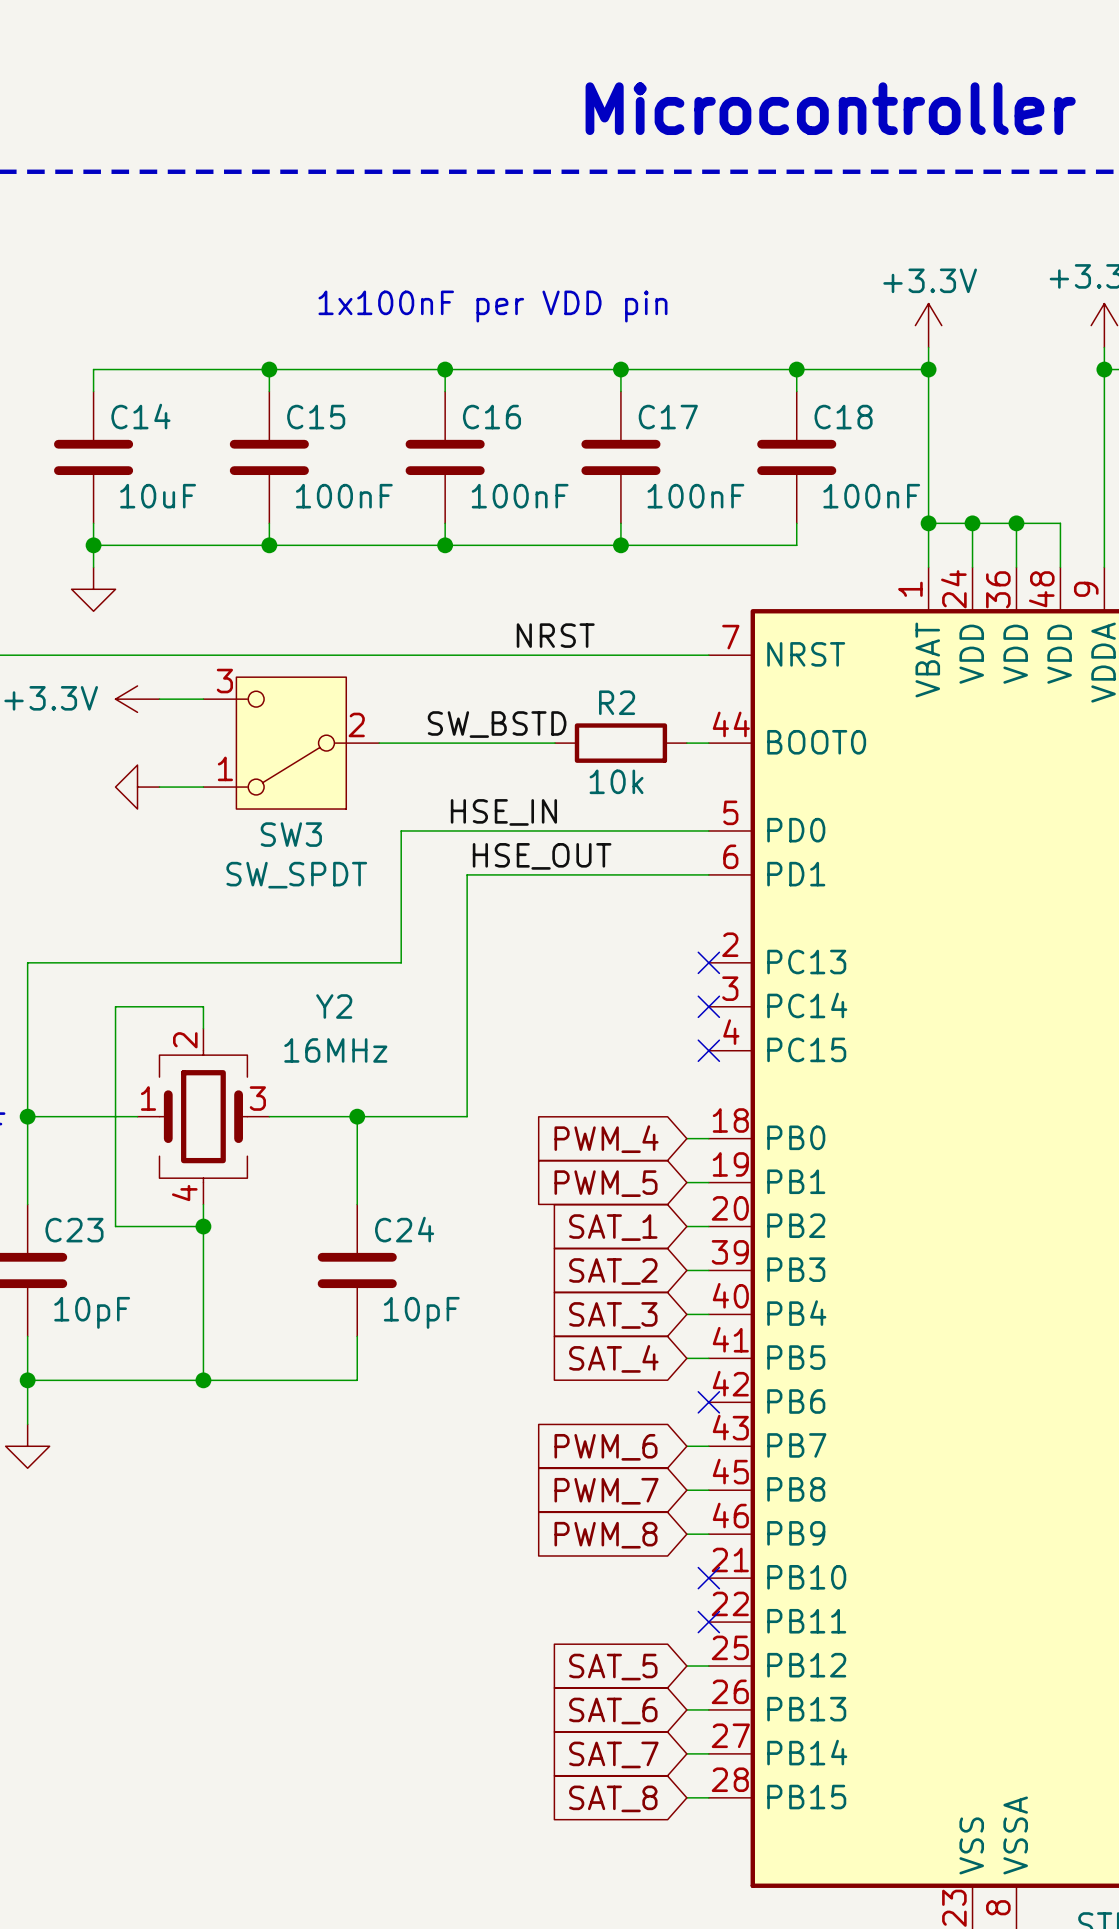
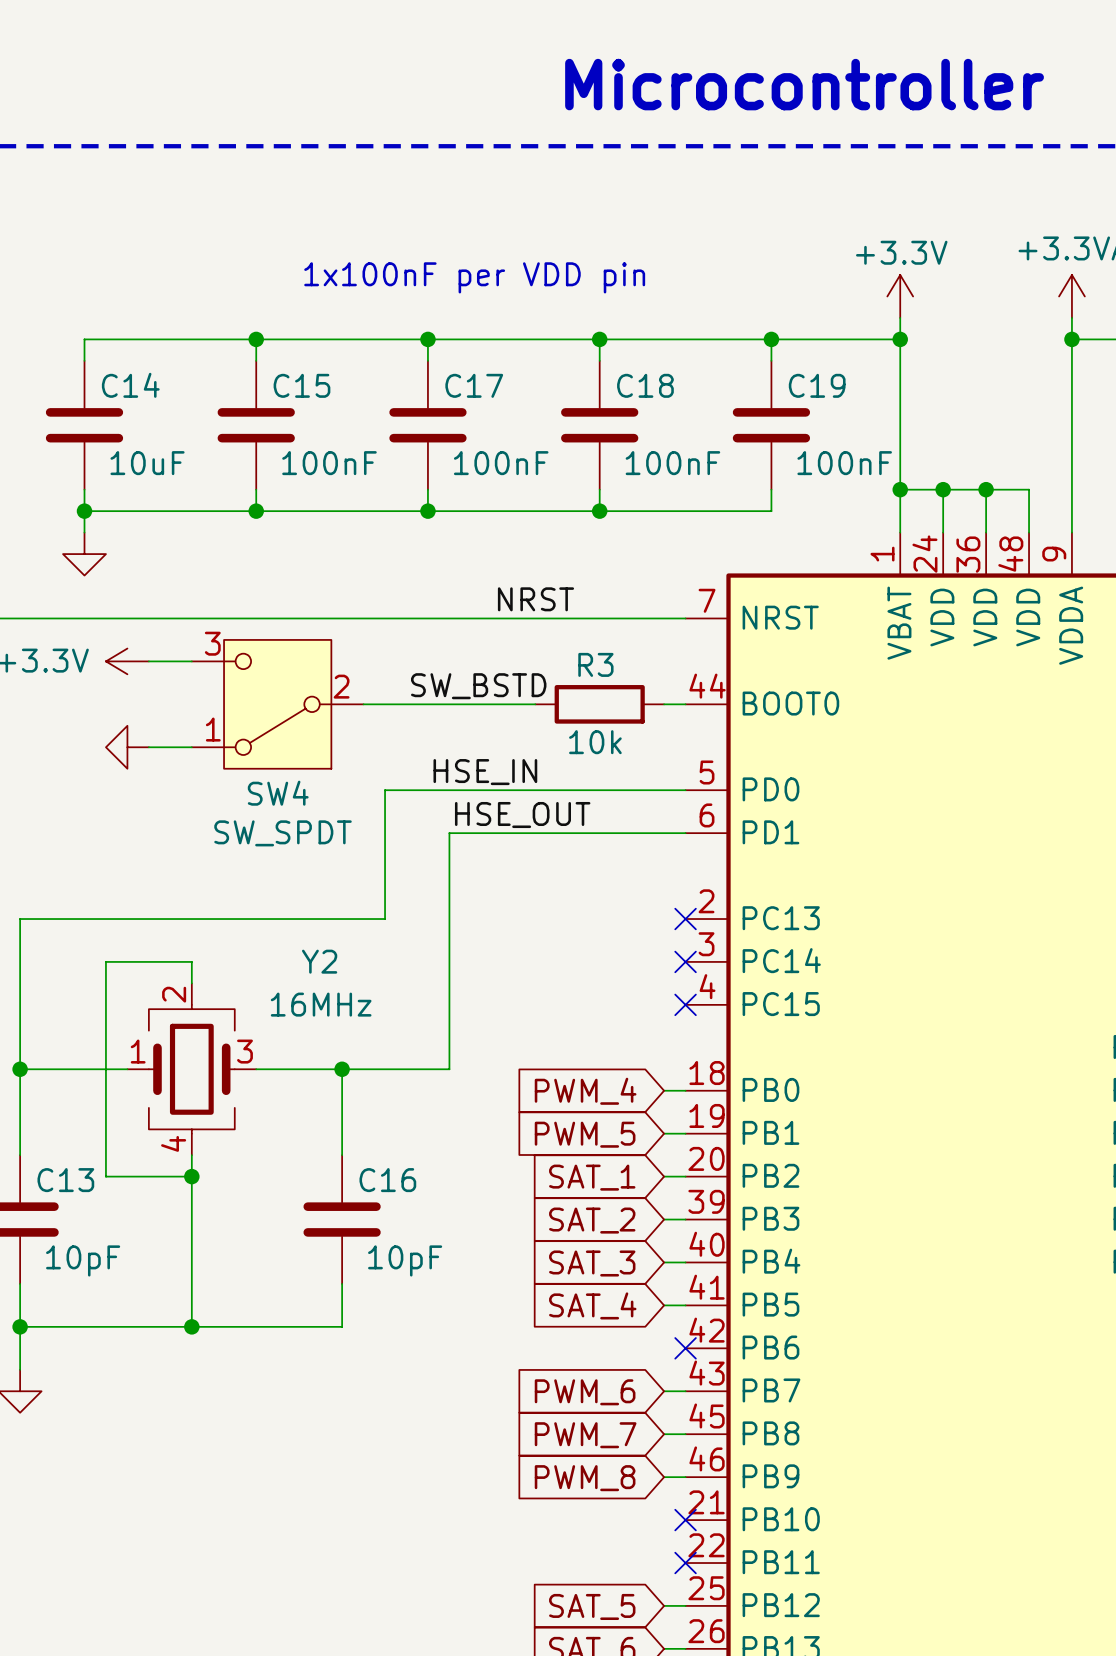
C16 name: C16 (491, 417) -> C17 (474, 385)
C17 name: C17 (668, 417) -> C18 (645, 385)
C18 name: C18 (843, 417) -> C19 (817, 385)
R2 name: R2 (617, 702) -> R3 (595, 664)
SW3 name: SW3 (291, 834) -> SW4 (278, 793)
C24 name: C24 (404, 1229) -> C16 (387, 1180)
C23 name: C23 (74, 1230) -> C13 (65, 1180)

